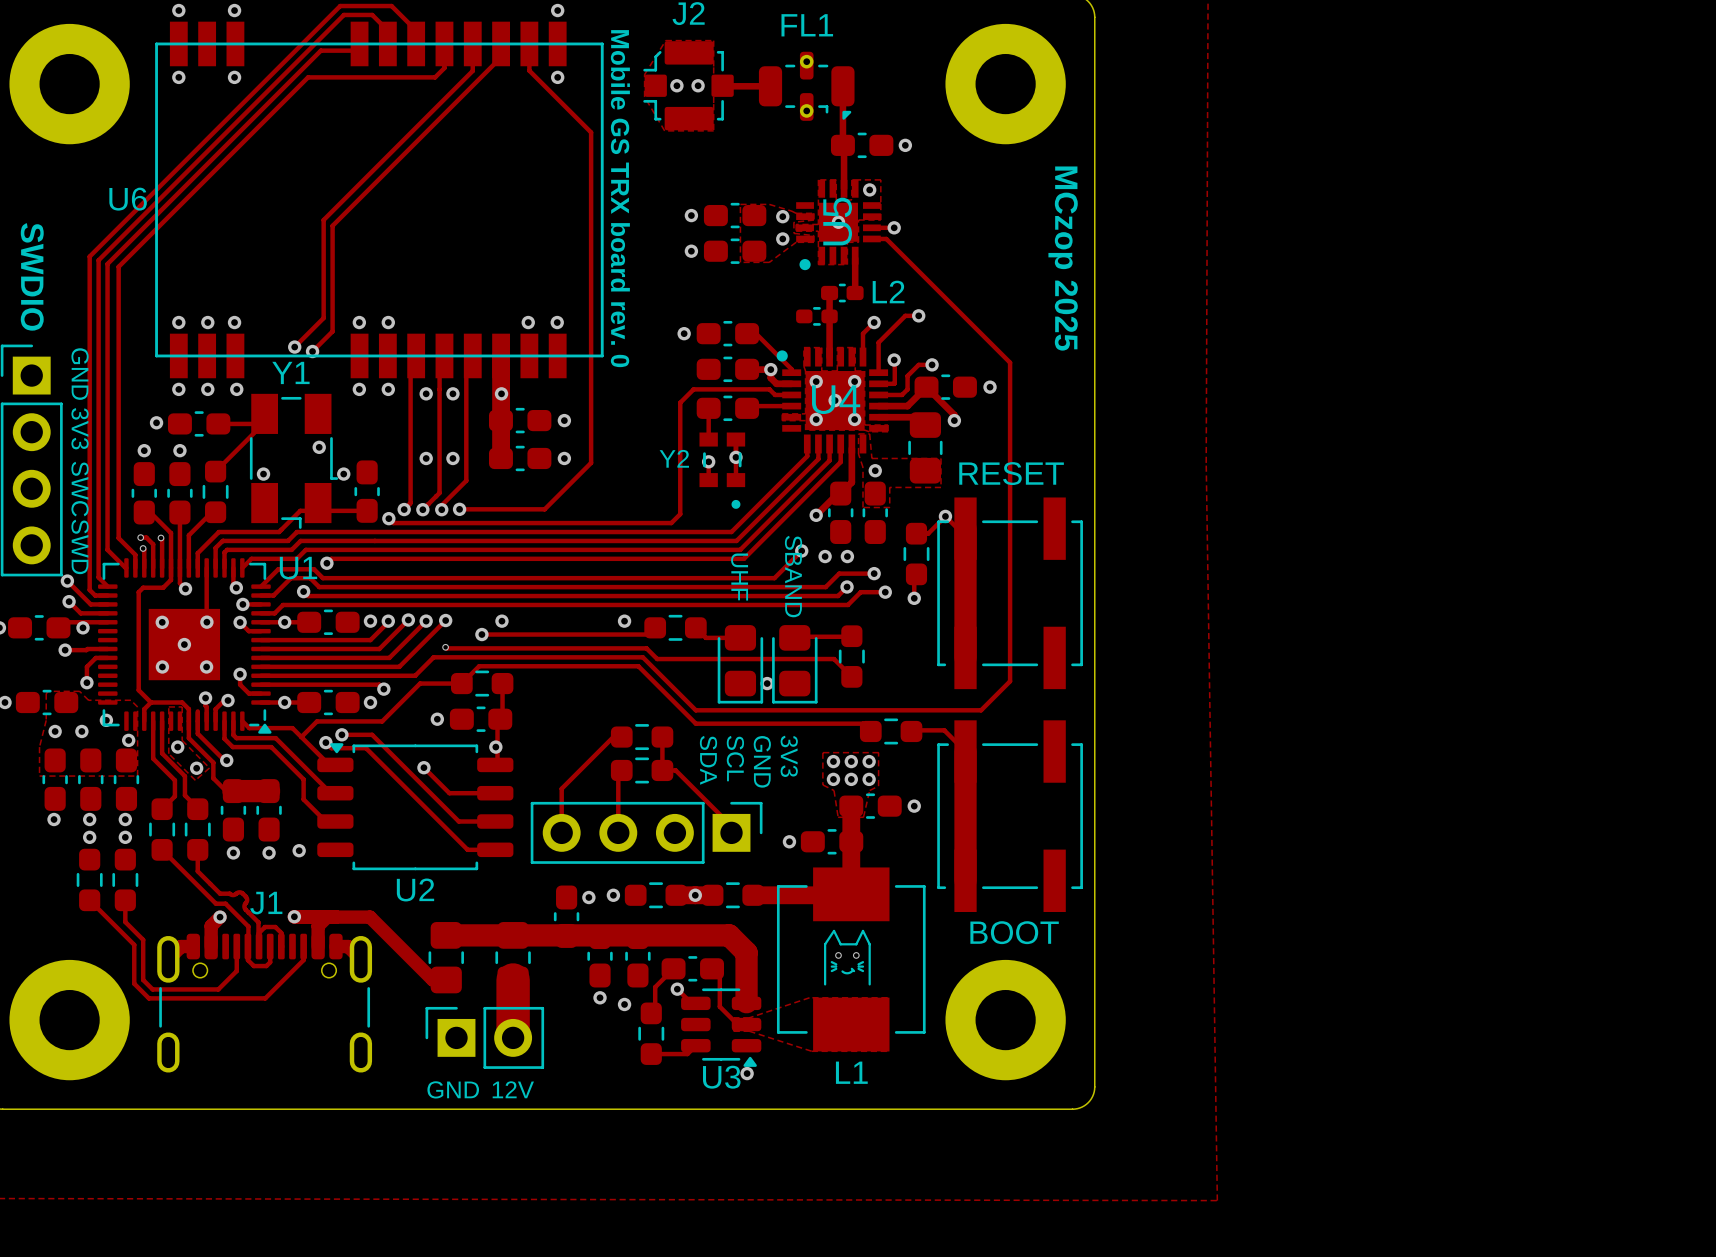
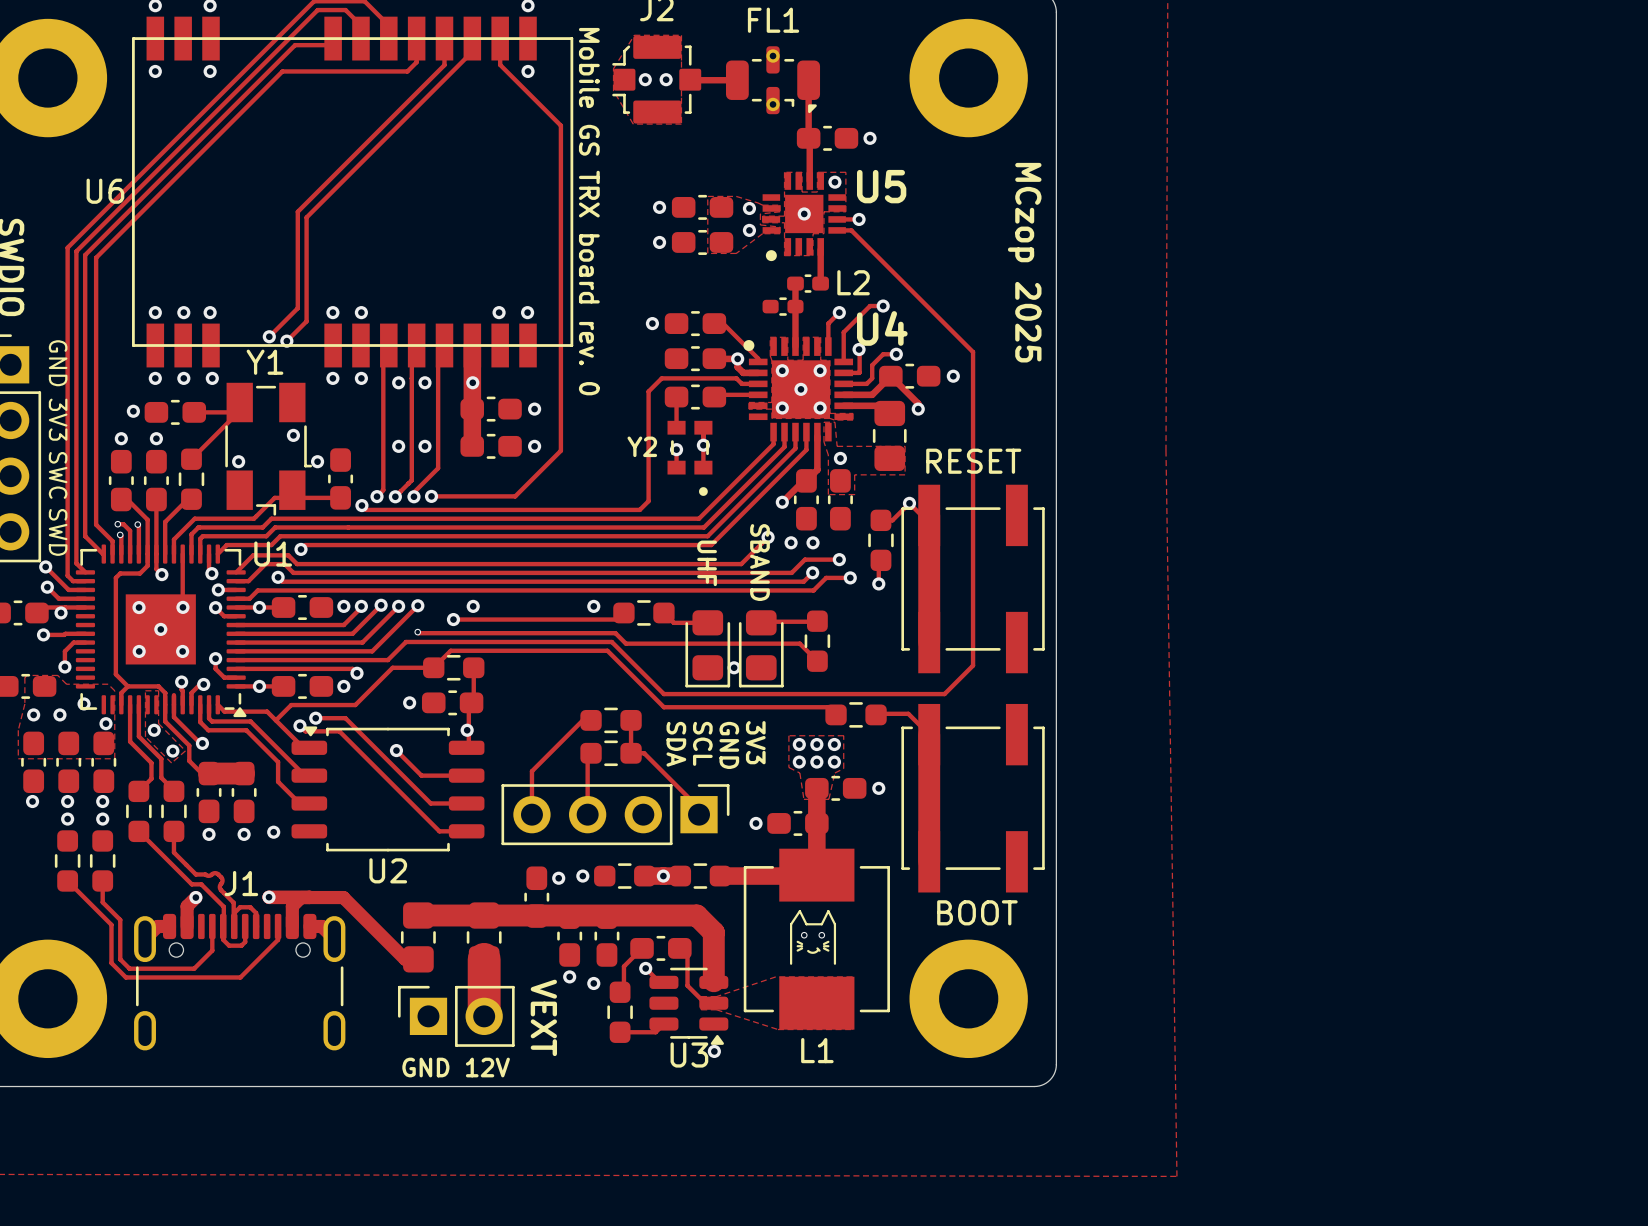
U5 name rotation: 0° (837, 221) -> 90° clockwise (881, 186)
U5 name position: U5 (837, 221) -> U5 (881, 186)
U4 name position: U4 (836, 399) -> U4 (882, 328)
text: none -> VEXT (543, 1017)

